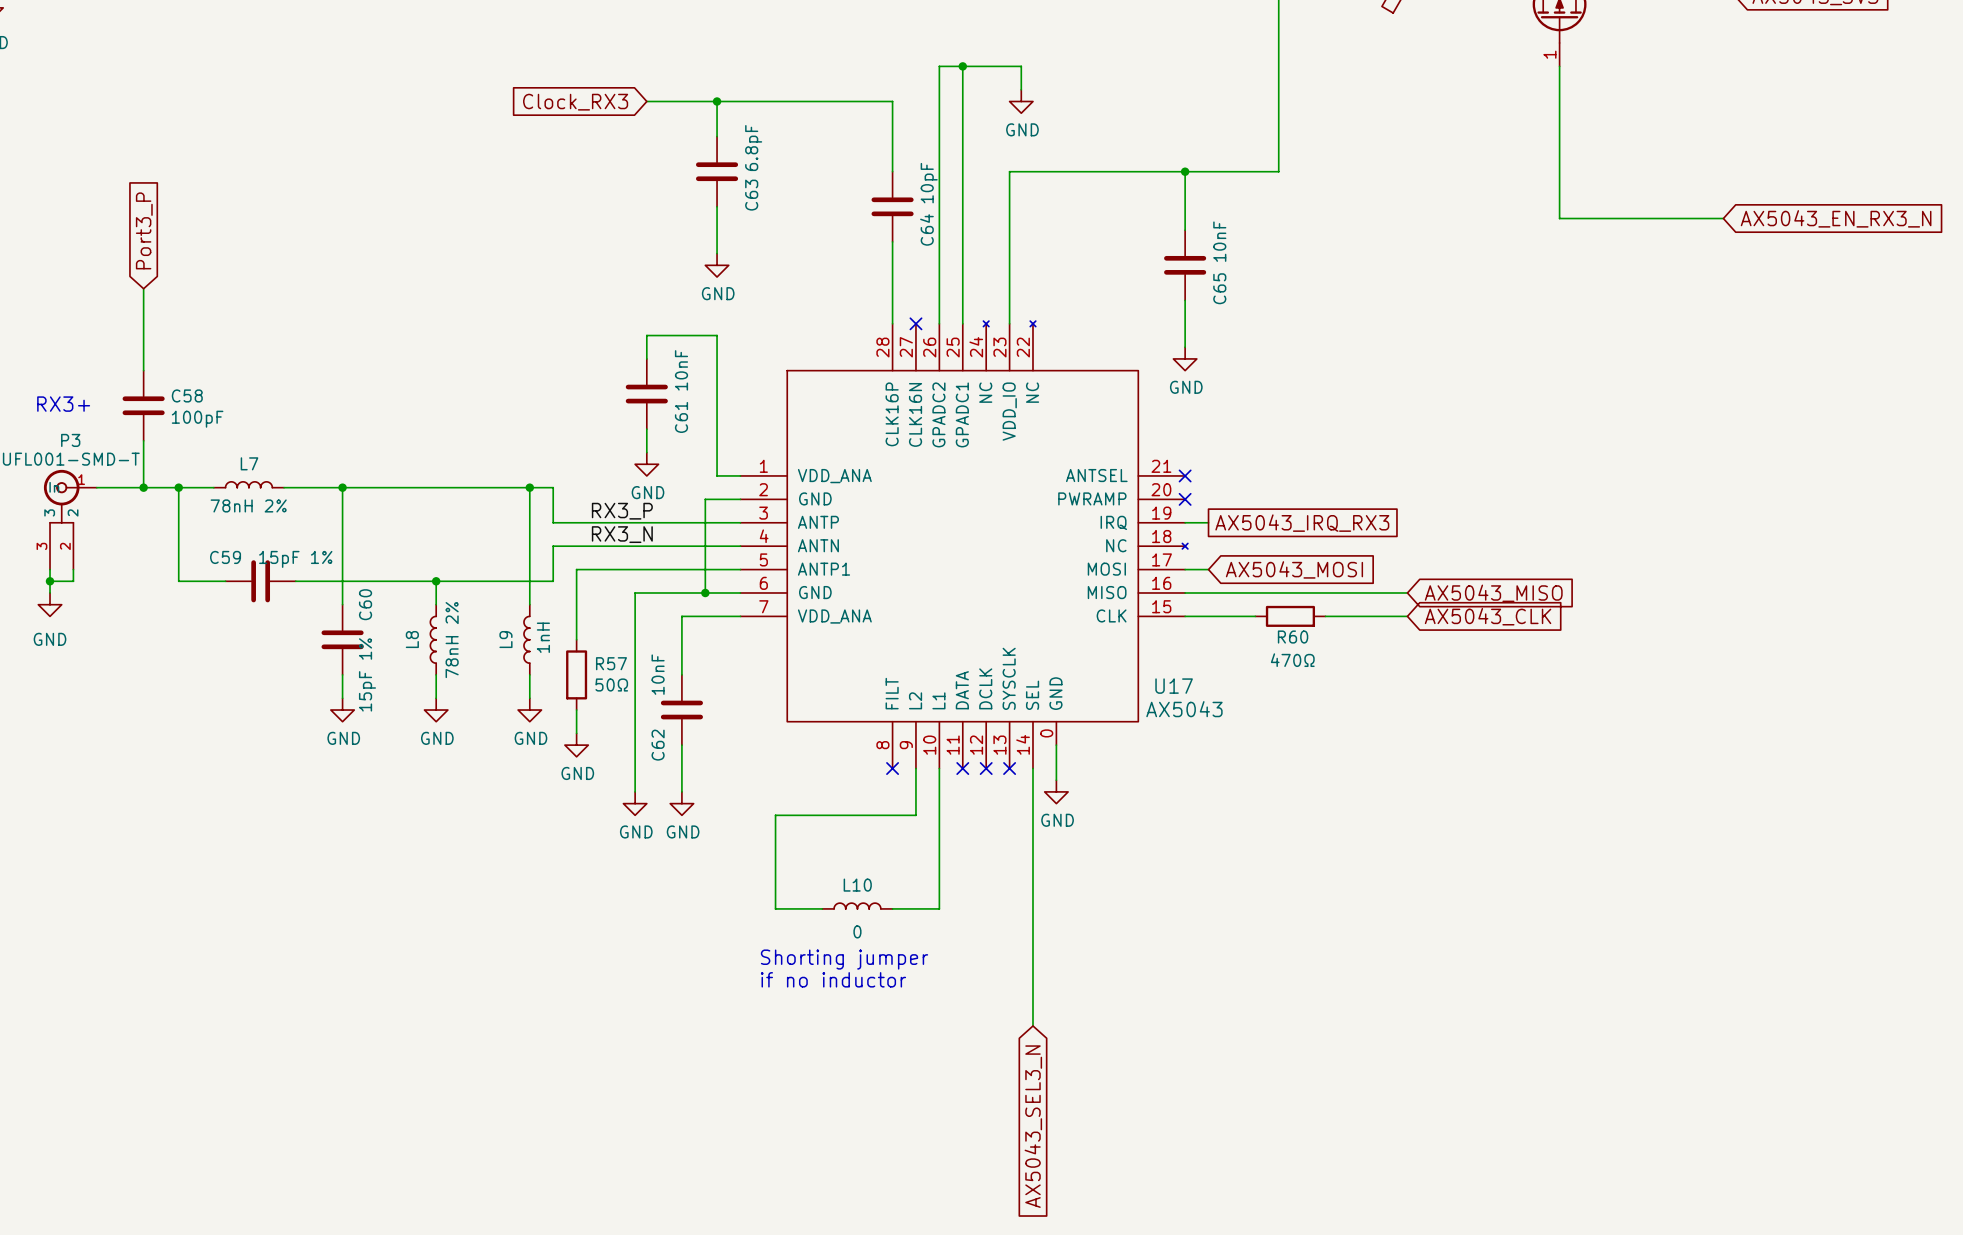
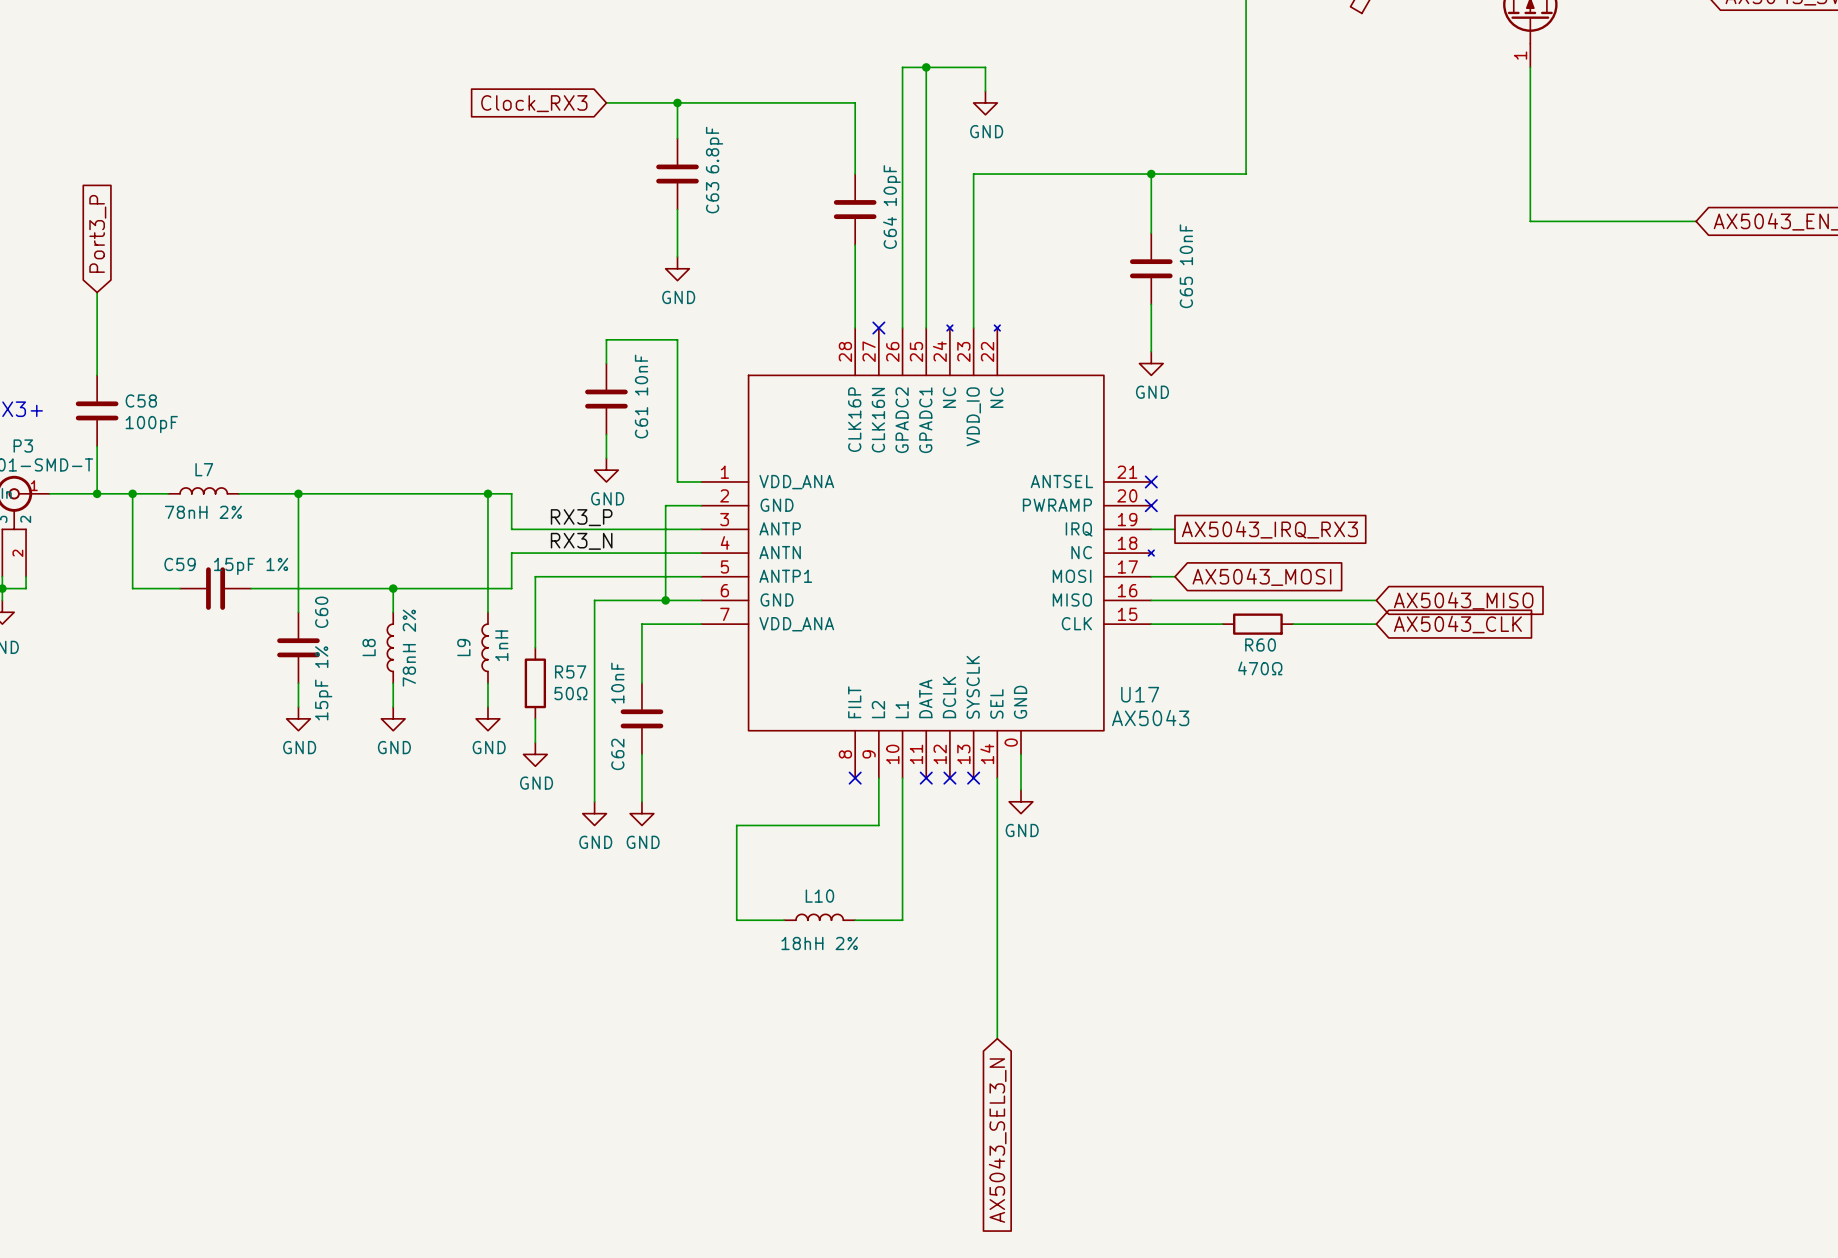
L10 value: 0 (857, 931) -> 18hH 2% (819, 943)
text: Shorting jumper (844, 959) -> none
text: if no inductor (833, 979) -> none

